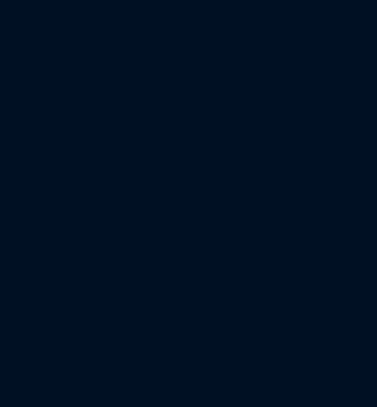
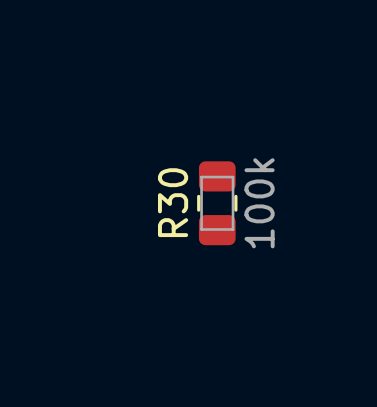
R30: none -> 100k (217, 203)

